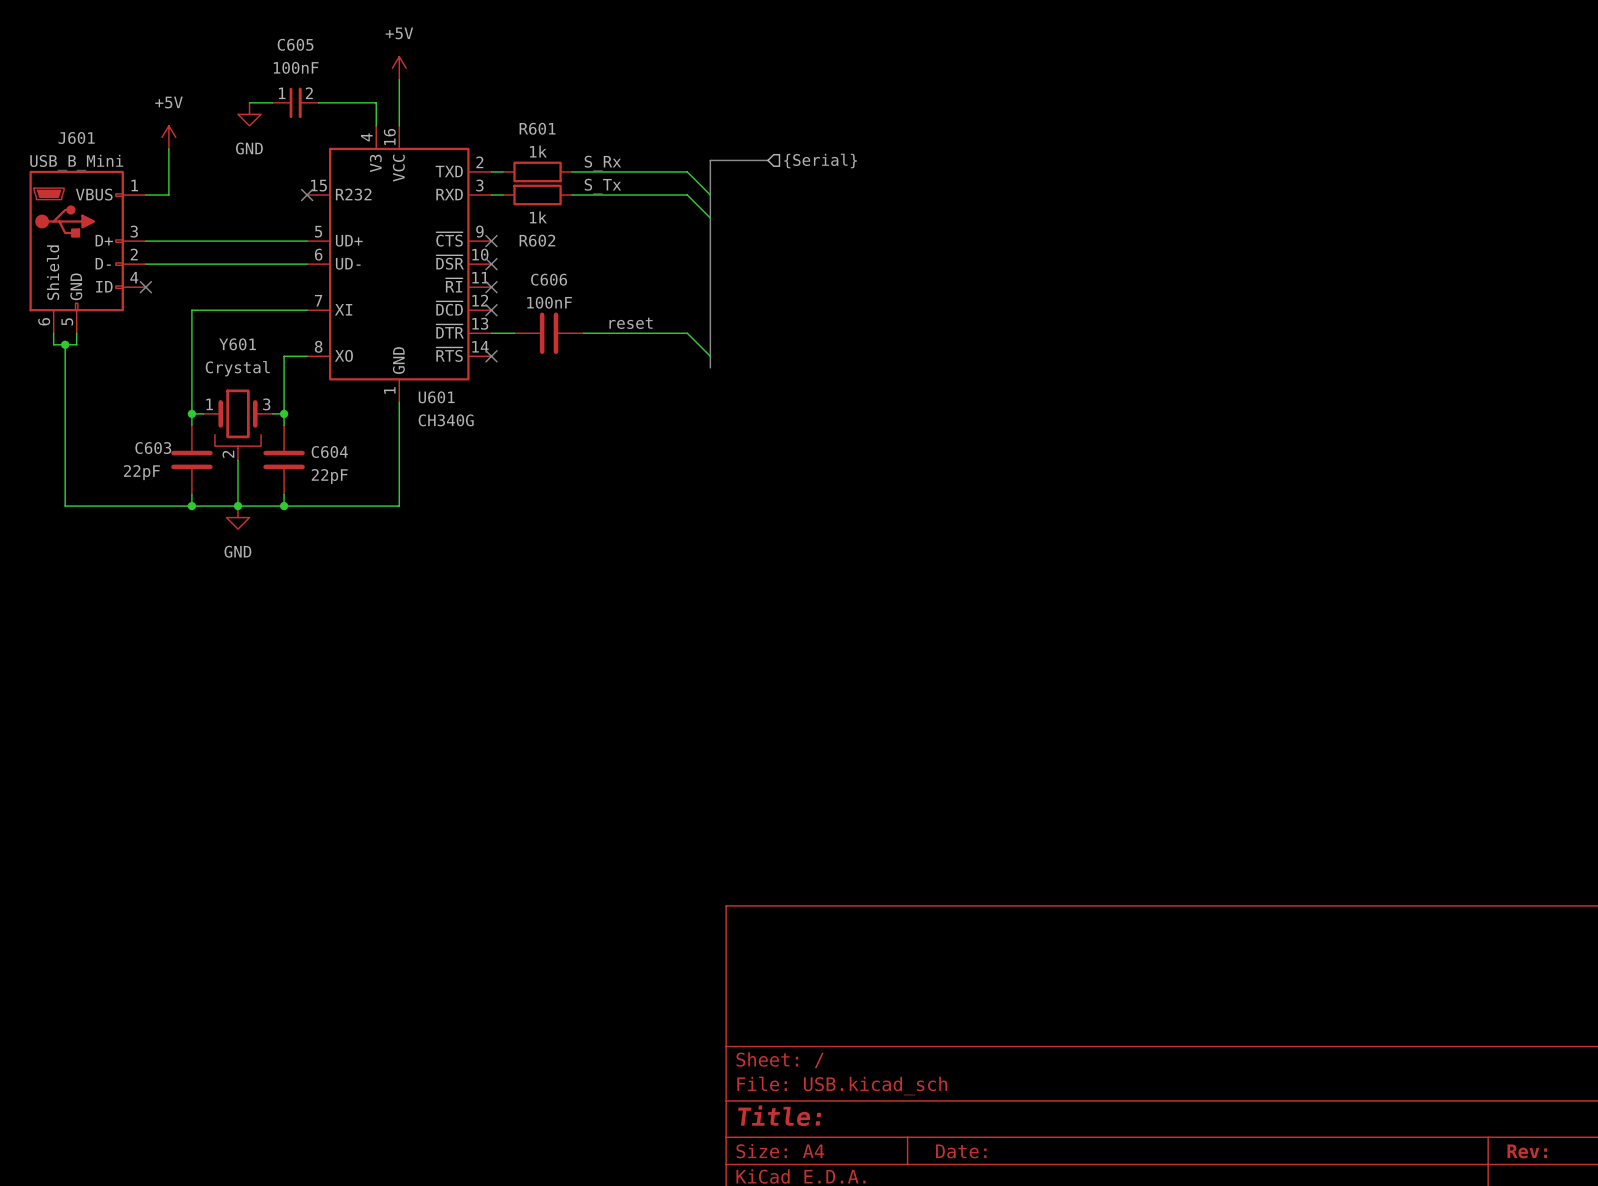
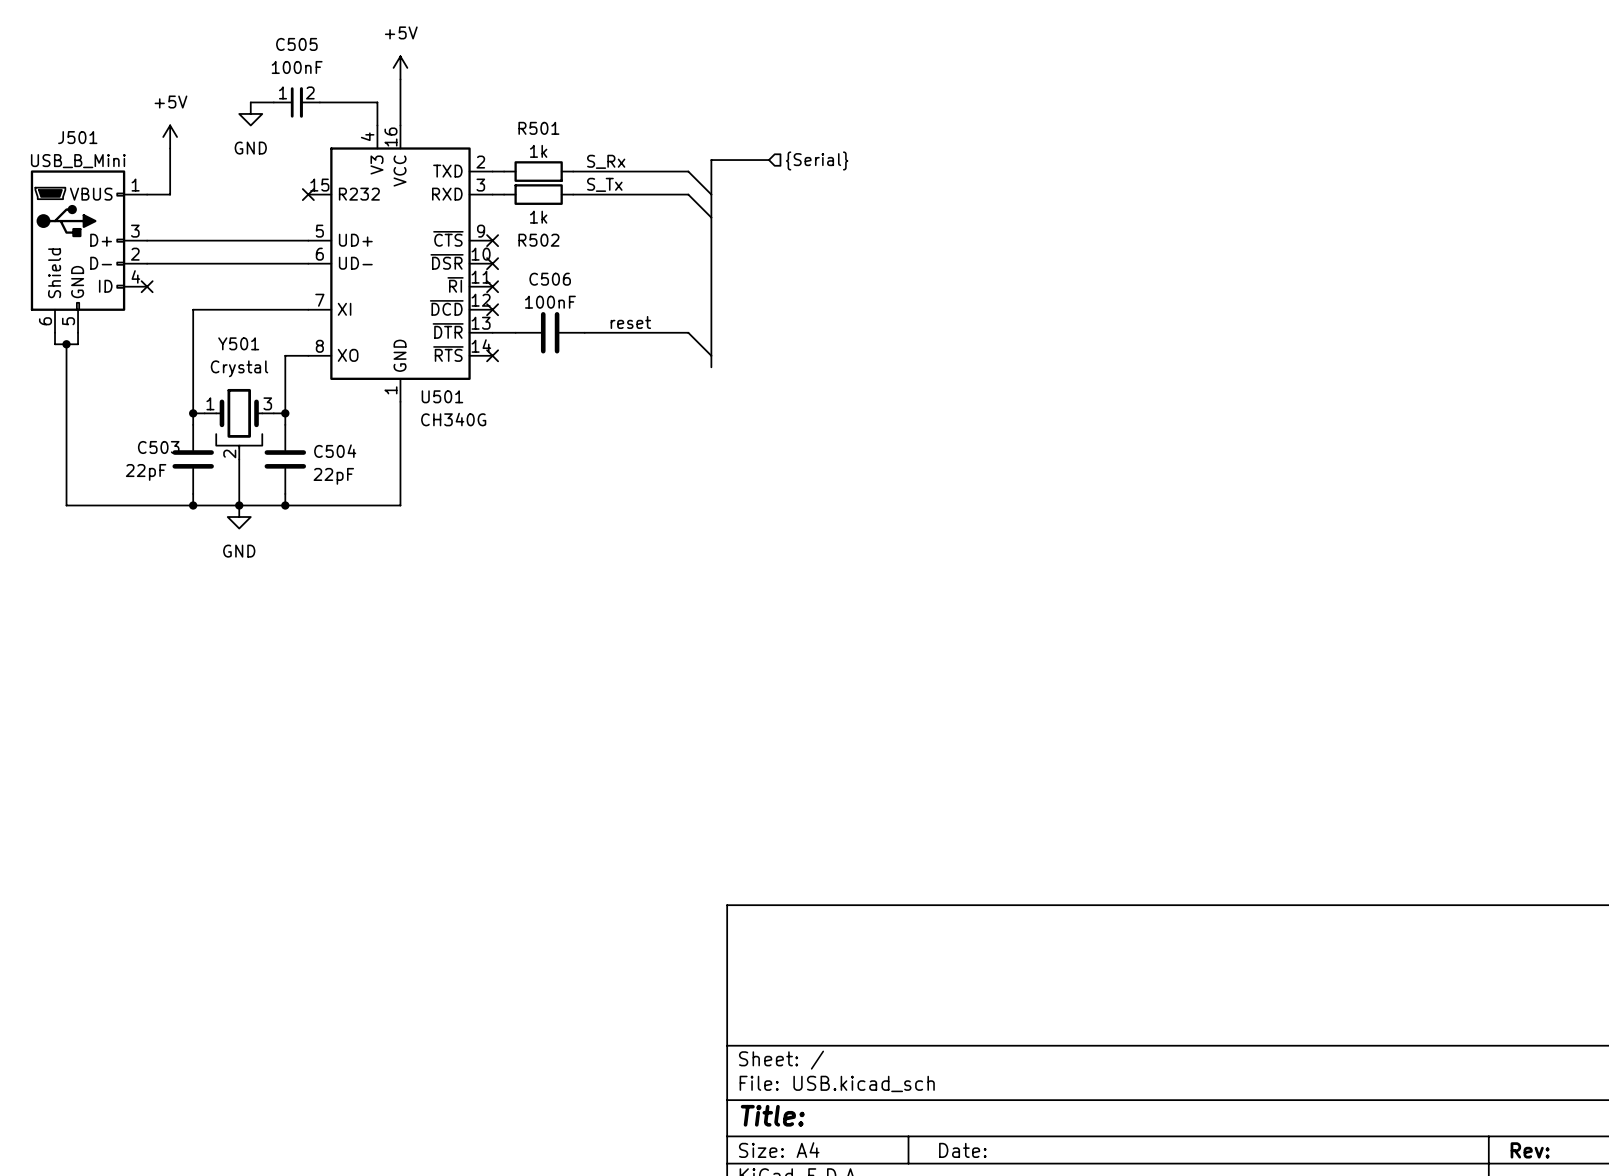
C605 name: C605 (295, 44) -> C505 (296, 44)
R601 name: R601 (537, 128) -> R501 (538, 128)
J601 name: J601 (76, 137) -> J501 (77, 137)
R602 name: R602 (537, 240) -> R502 (538, 240)
C606 name: C606 (549, 279) -> C506 (550, 279)
Y601 name: Y601 (237, 344) -> Y501 (238, 343)
U601 name: U601 (436, 397) -> U501 (442, 396)
C603 name: C603 (153, 448) -> C503 (158, 447)
C604 name: C604 (329, 451) -> C504 (335, 451)

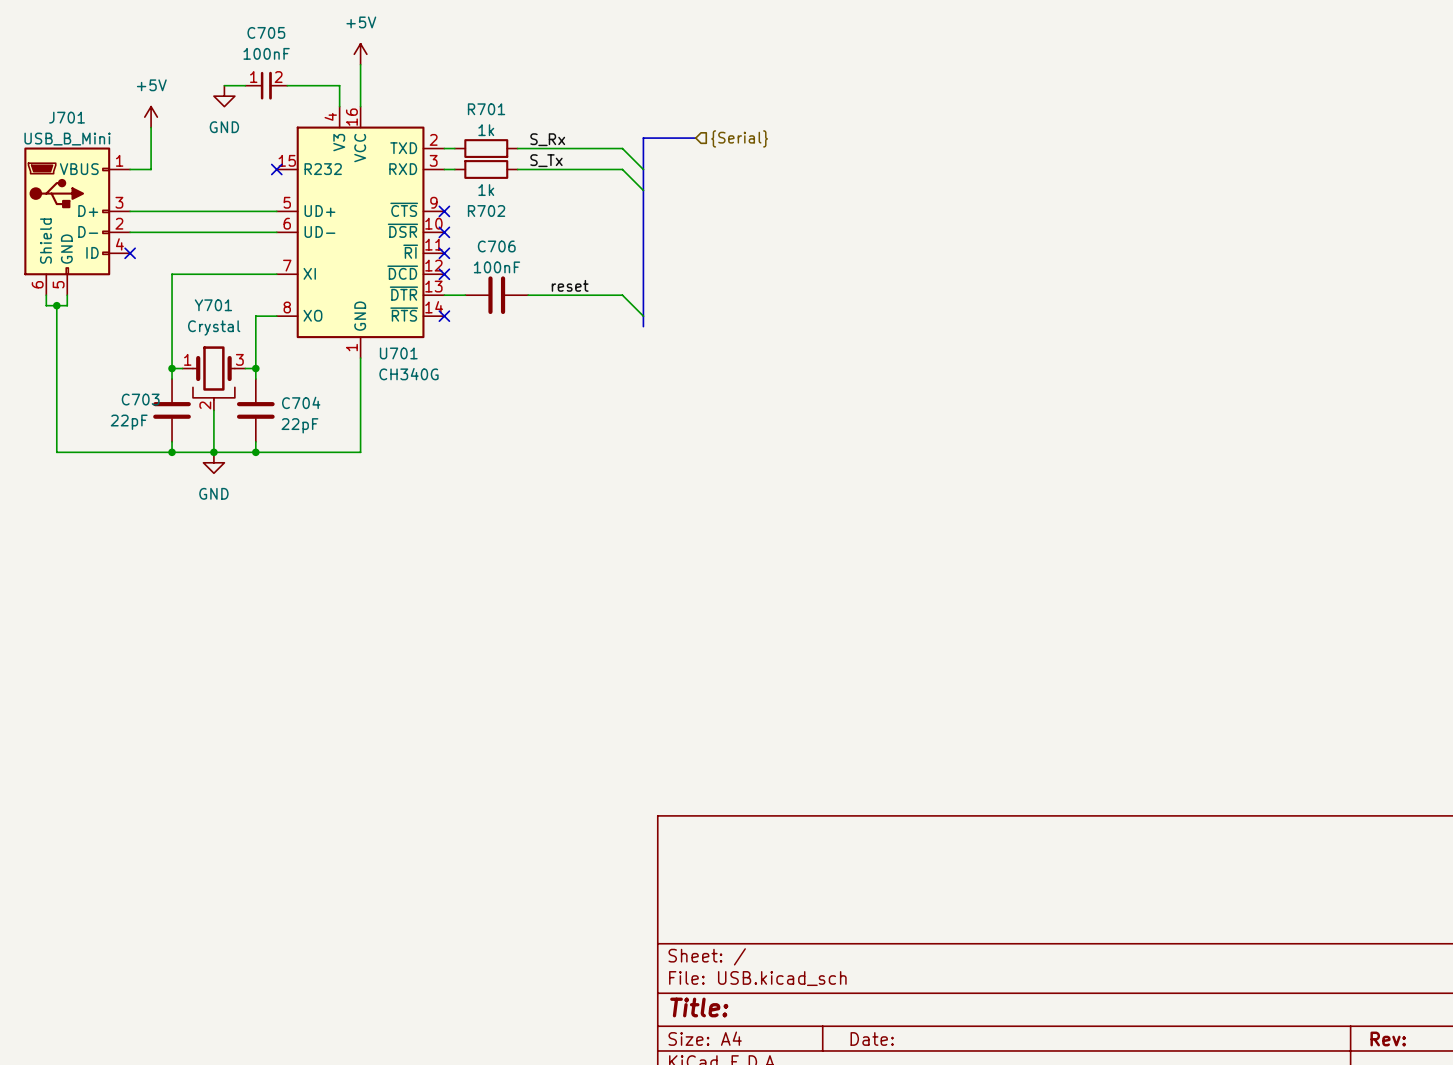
C505 name: C505 (296, 44) -> C705 (266, 32)
R501 name: R501 (538, 128) -> R701 (486, 109)
J501 name: J501 (77, 137) -> J701 (67, 117)
R502 name: R502 (538, 240) -> R702 (486, 211)
C506 name: C506 (550, 279) -> C706 (496, 246)
Y501 name: Y501 (238, 343) -> Y701 (213, 305)
U501 name: U501 (442, 396) -> U701 (398, 353)
C503 name: C503 (158, 447) -> C703 (140, 399)
C504 name: C504 (335, 451) -> C704 (301, 402)

